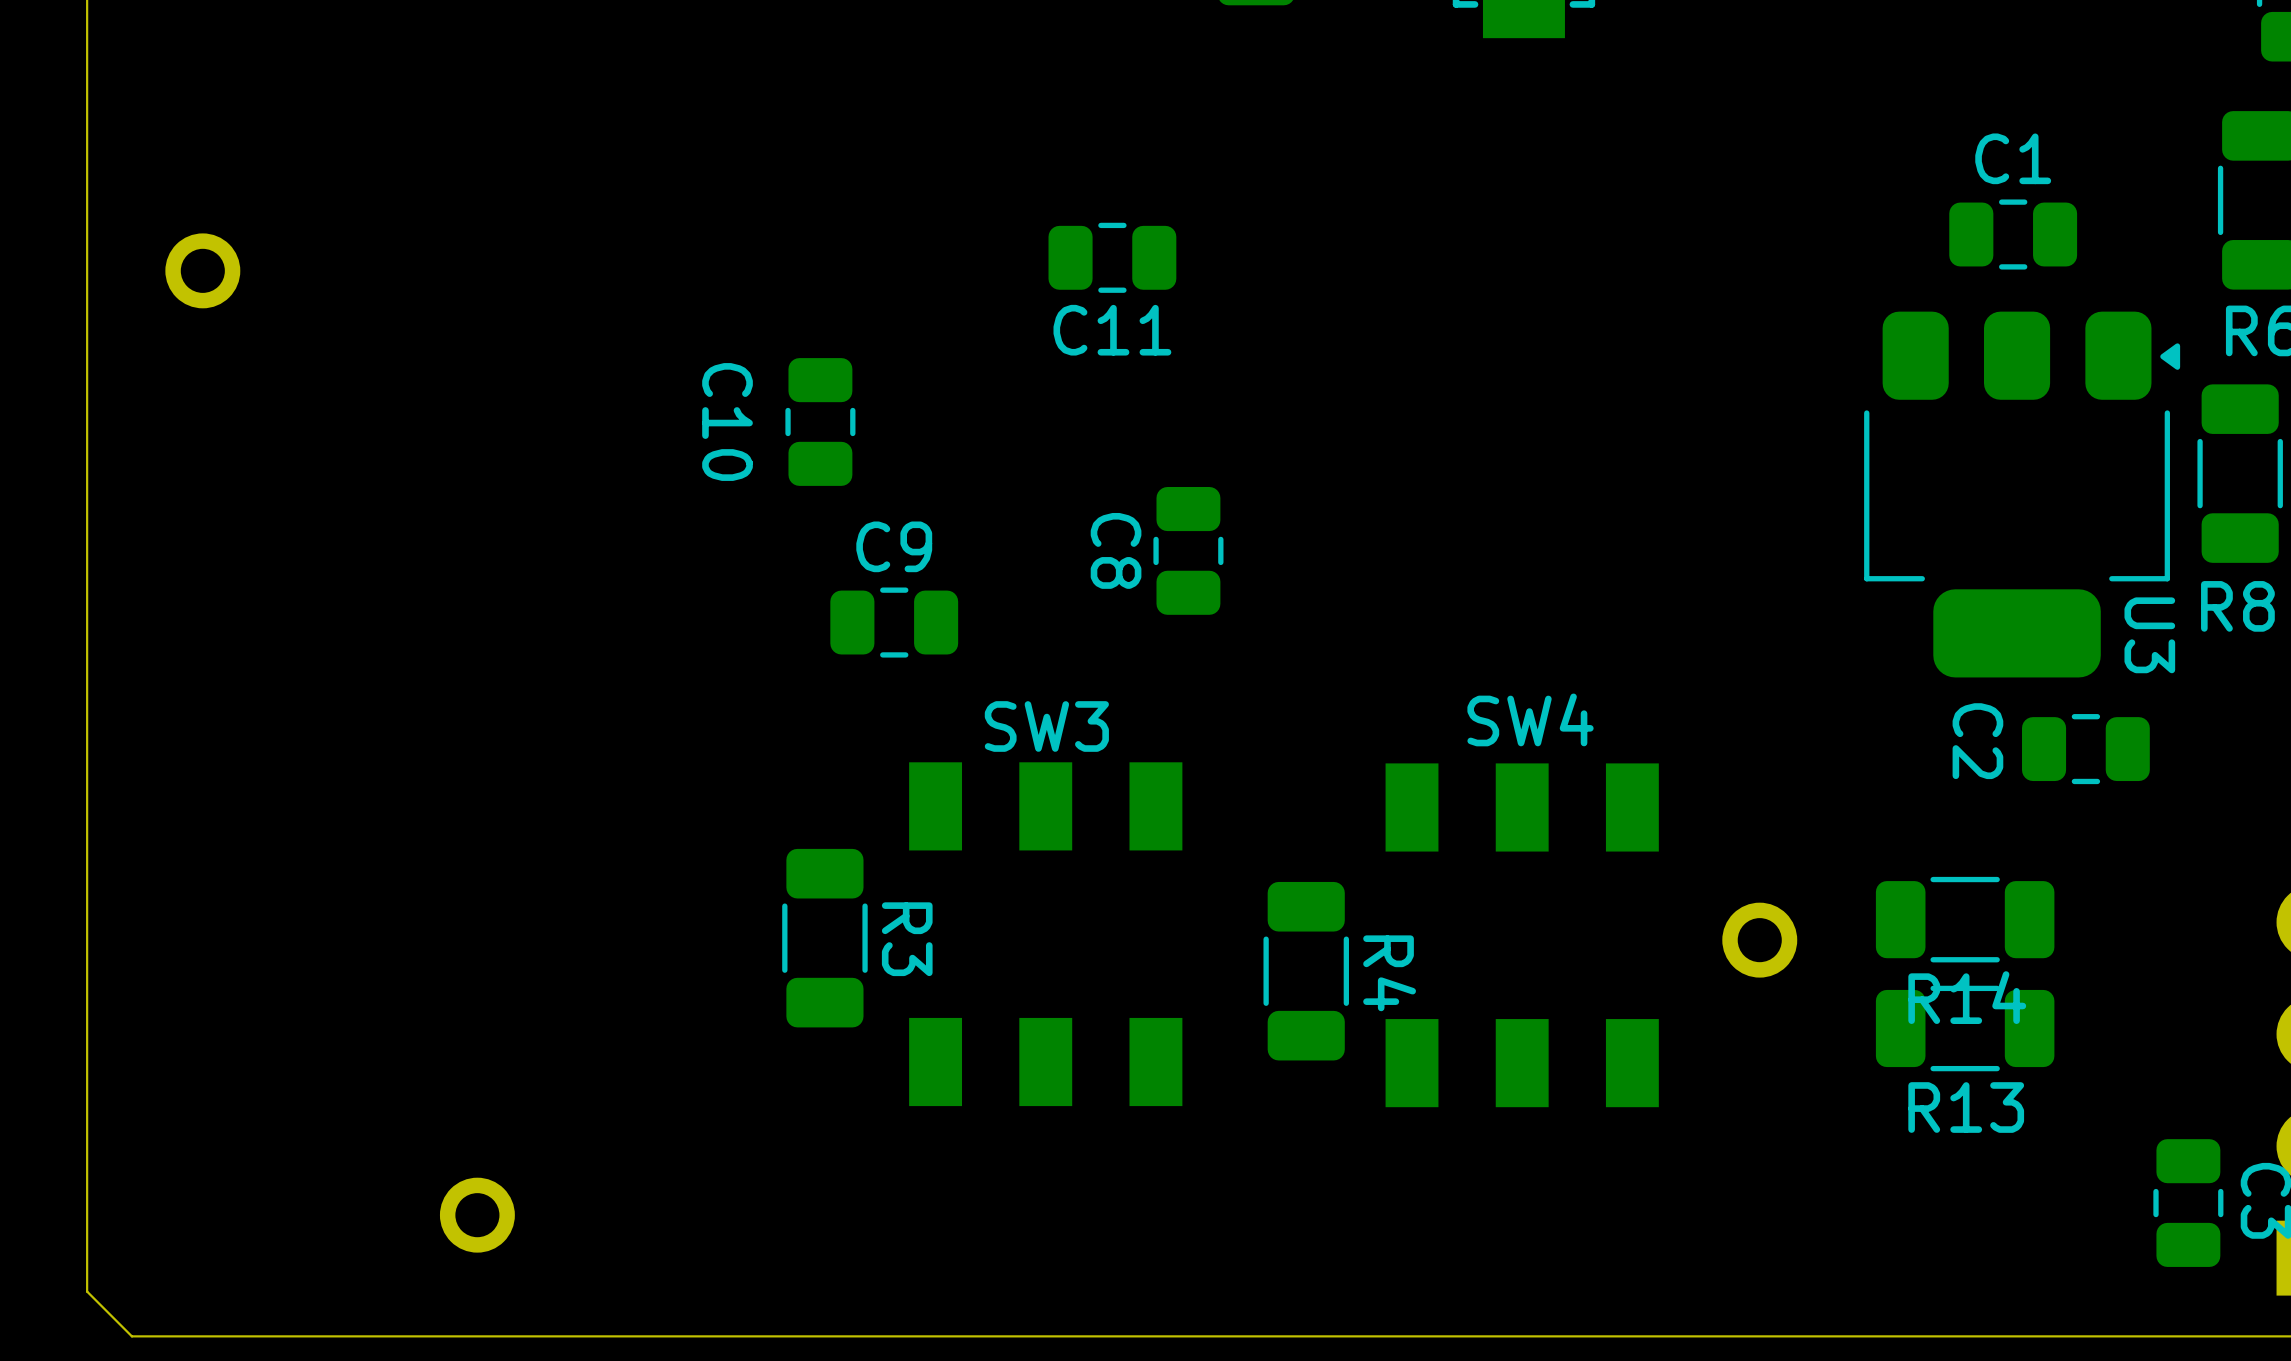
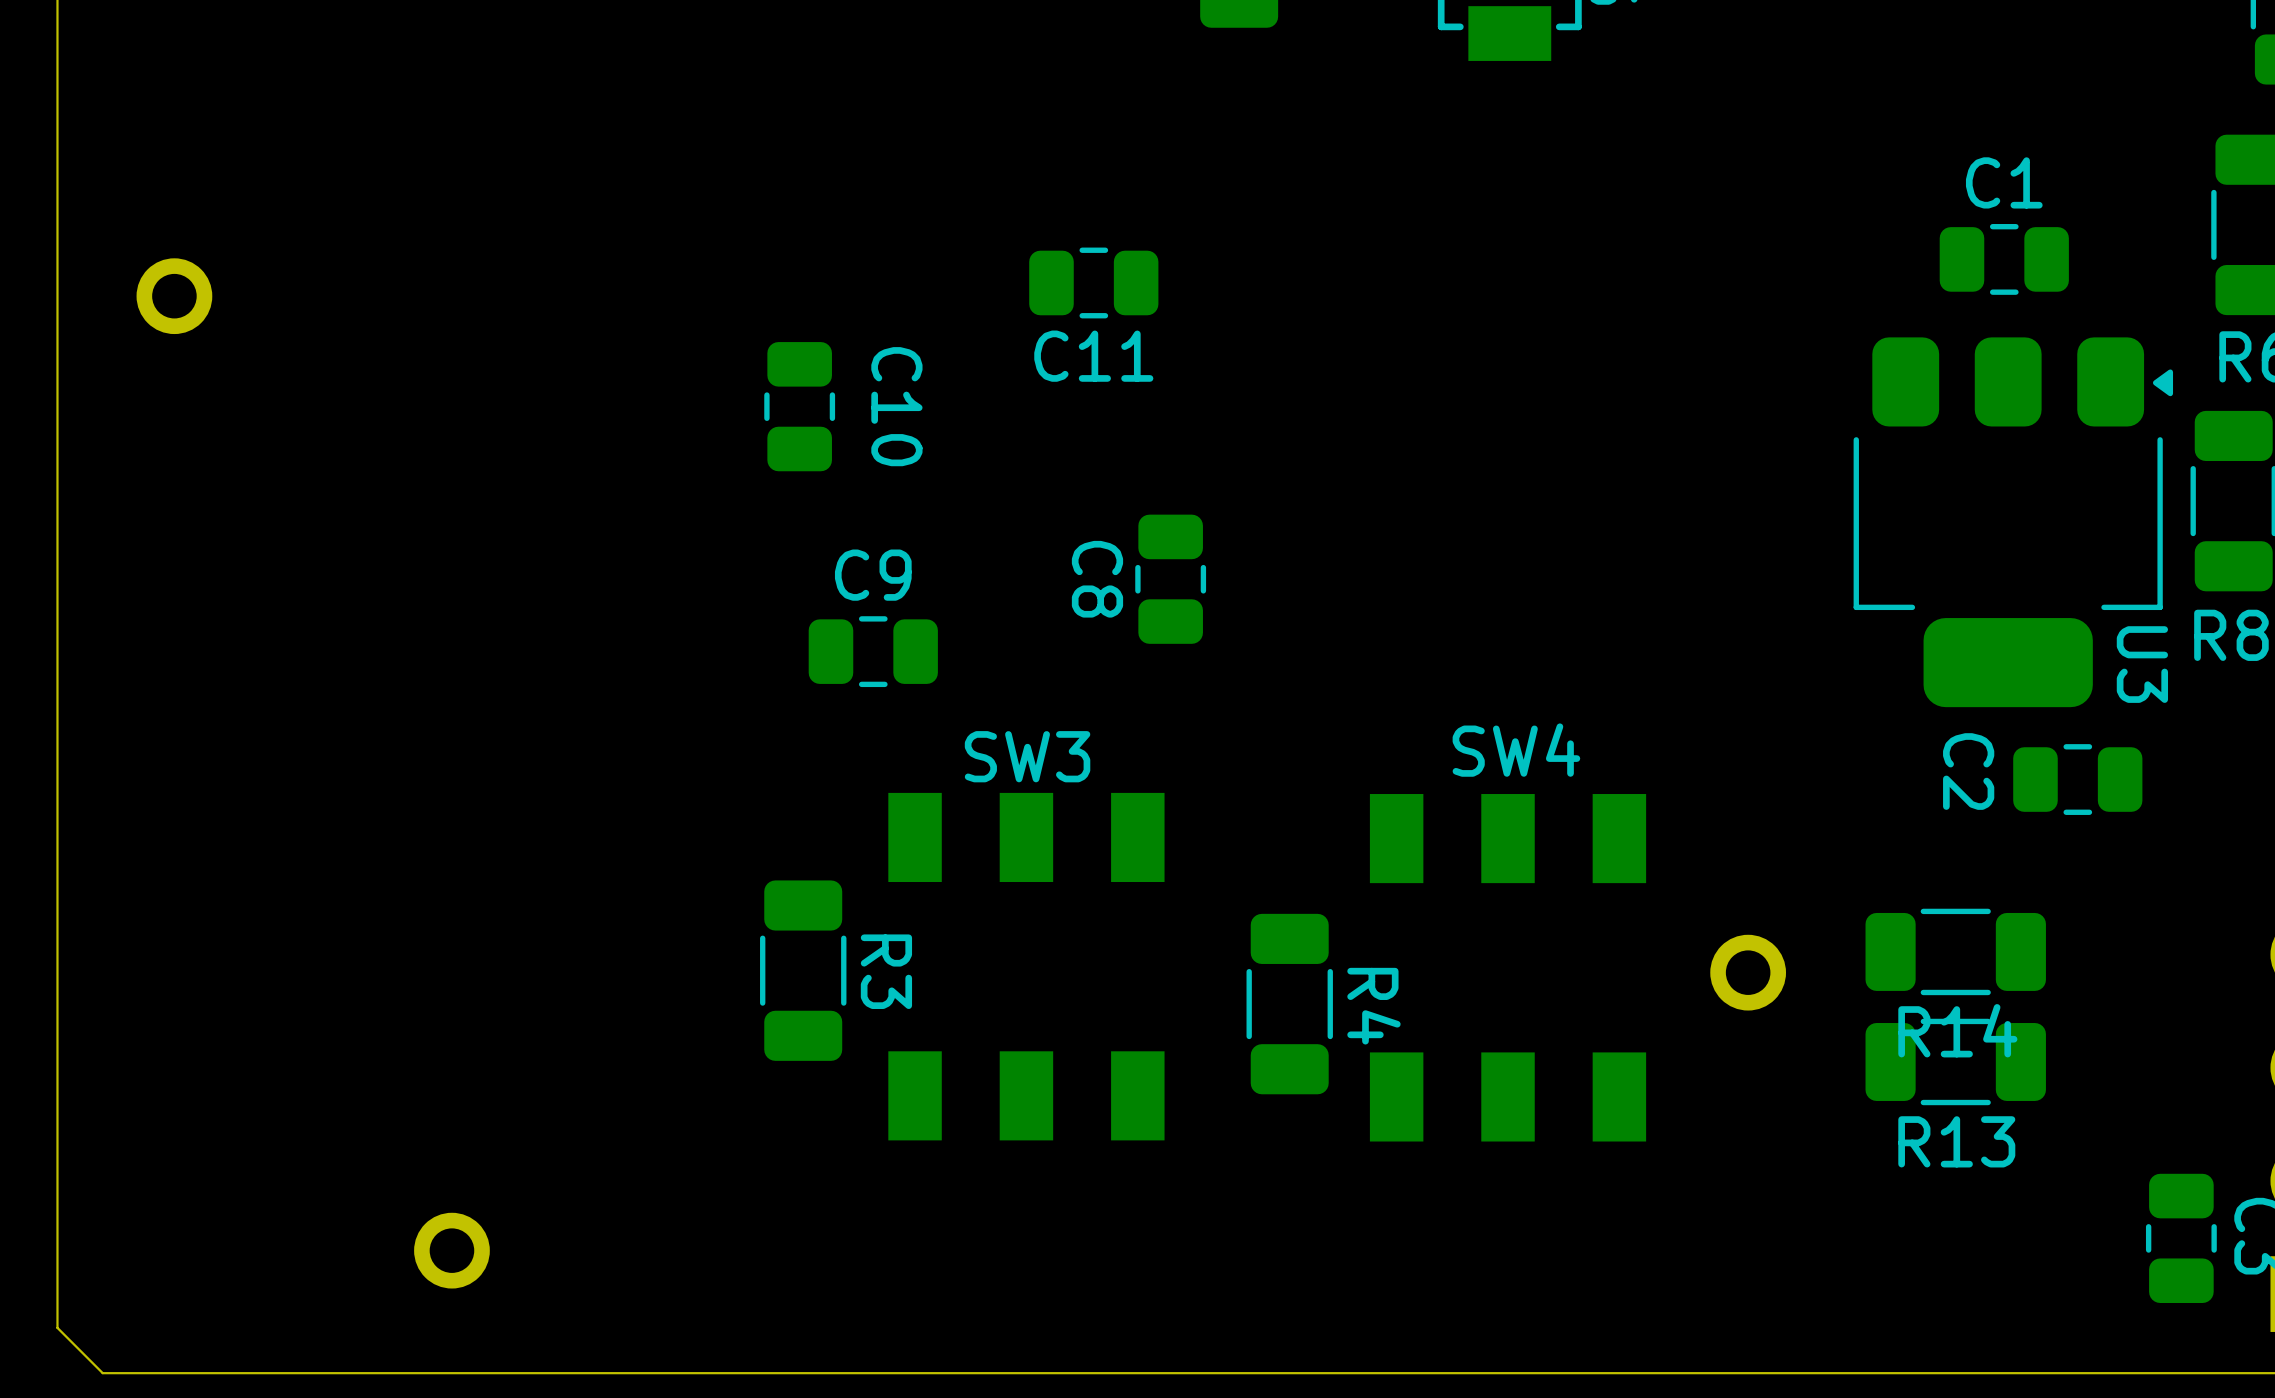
C10 name position: C10 (727, 421) -> C10 (896, 406)
C10 position: (820, 421) -> (799, 406)

